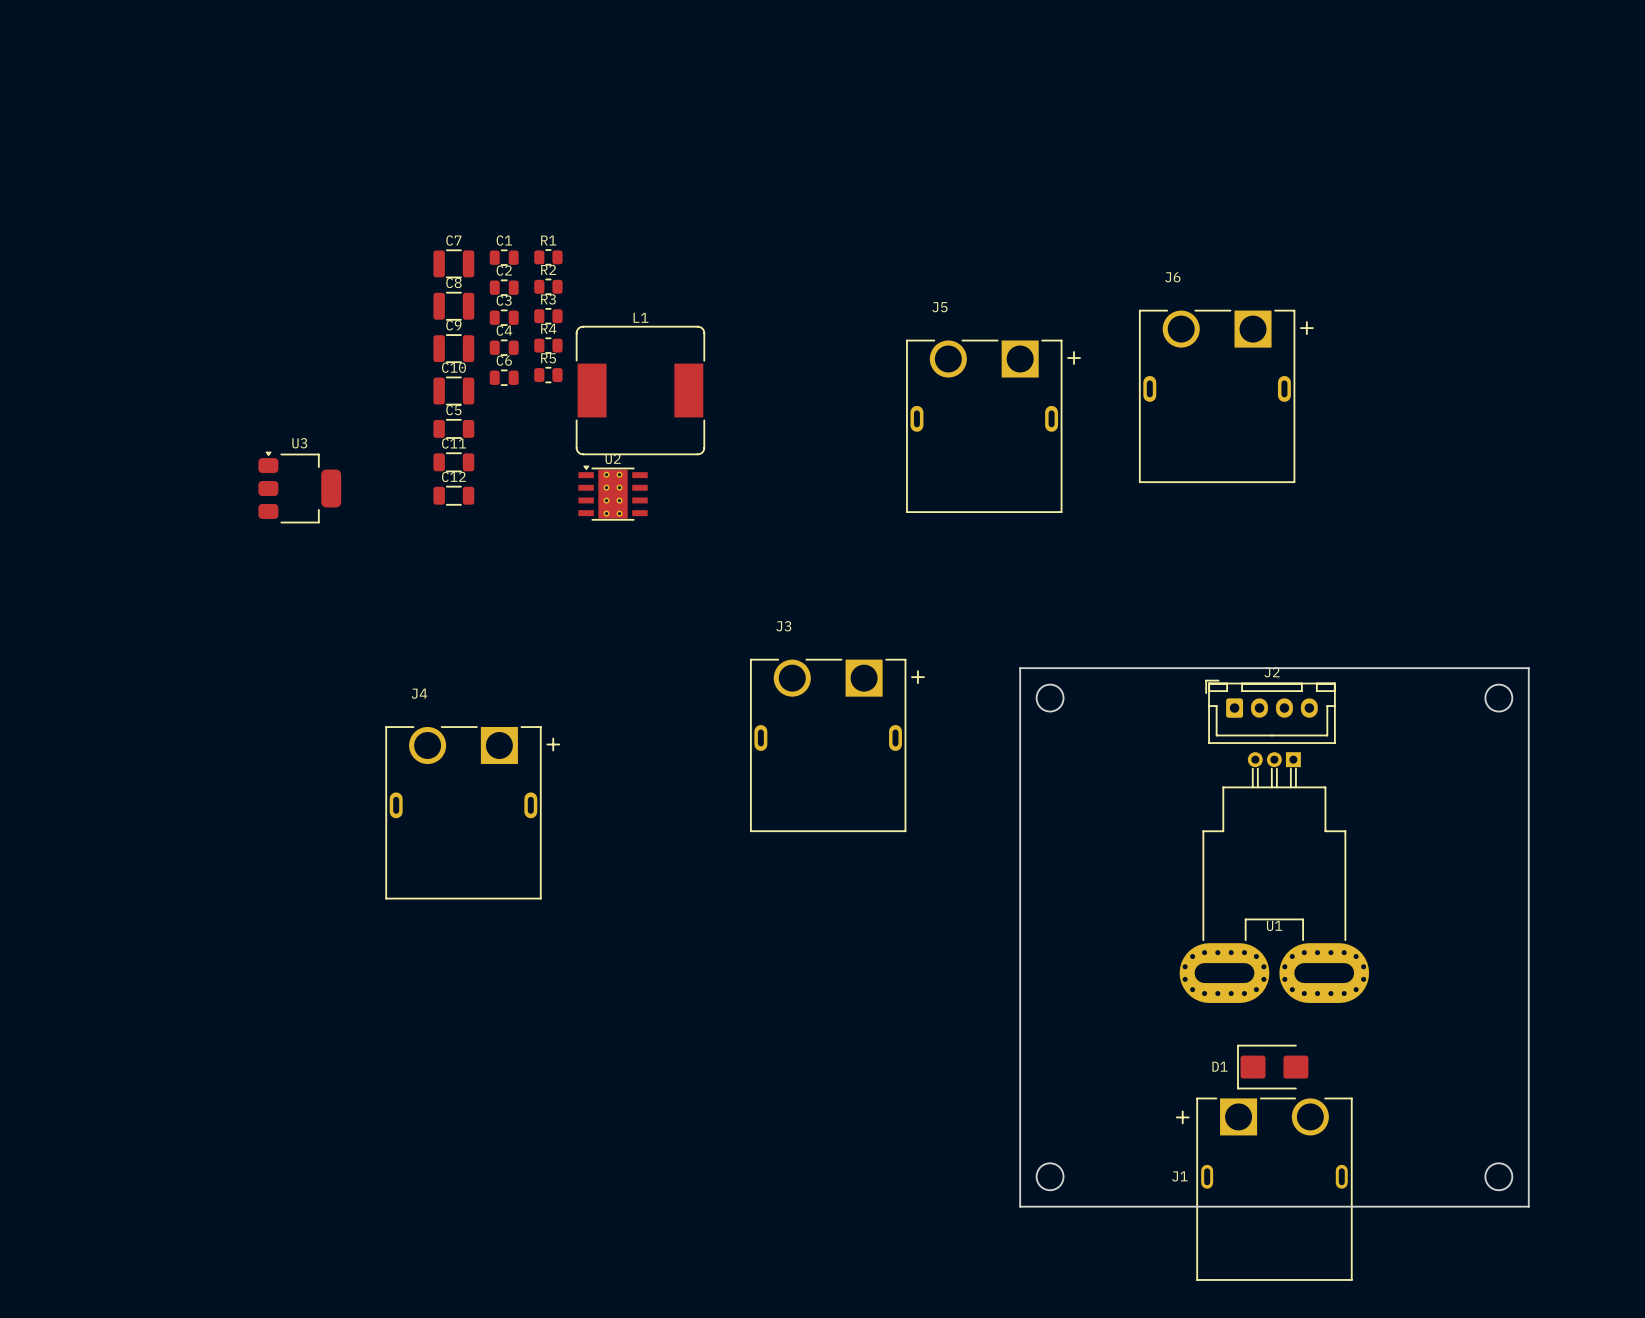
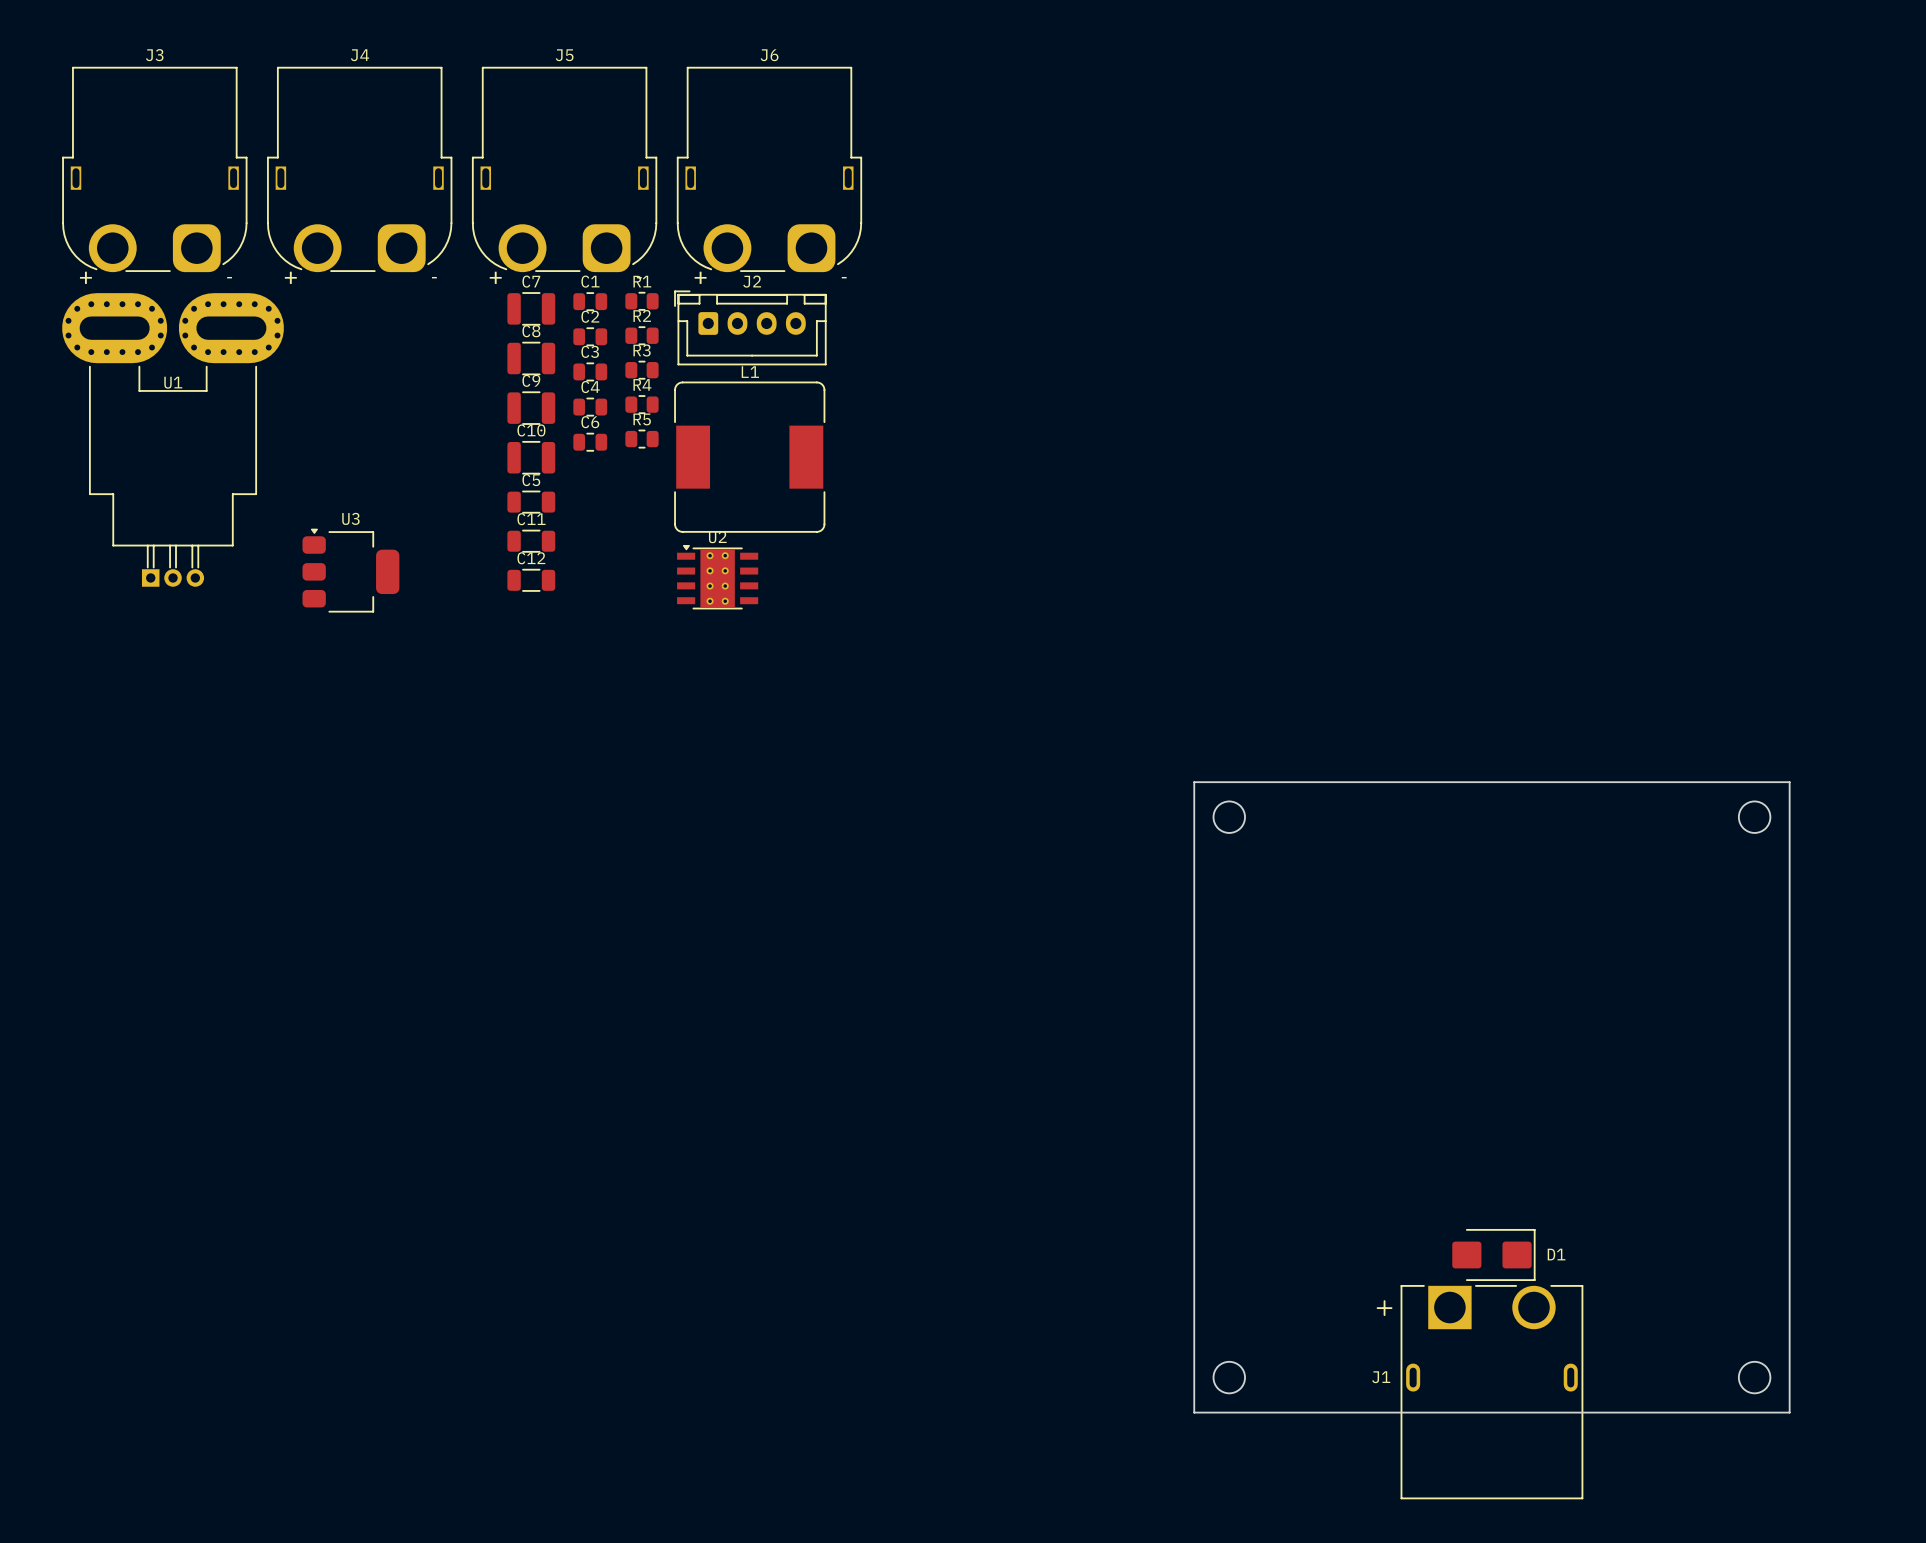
J6 name position: J6 (1172, 277) -> J6 (769, 55)
J5 name position: J5 (939, 307) -> J5 (564, 55)
J6 footprint: [1139, 310, 1314, 483] -> [677, 67, 862, 273]
J5 footprint: [906, 339, 1081, 513] -> [472, 67, 658, 273]
J3 name position: J3 (783, 626) -> J3 (154, 55)
J3 footprint: [750, 659, 925, 832] -> [62, 67, 248, 273]
J4 name position: J4 (419, 693) -> J4 (360, 55)
J2 position: (1270, 711) -> (750, 327)
J4 footprint: [385, 726, 560, 900] -> [267, 67, 453, 273]
U1 rotation: 0° (1274, 877) -> 180° (173, 439)
U1 position: (1274, 877) -> (173, 439)
D1 rotation: 0° (1272, 1067) -> 180° (1493, 1254)

